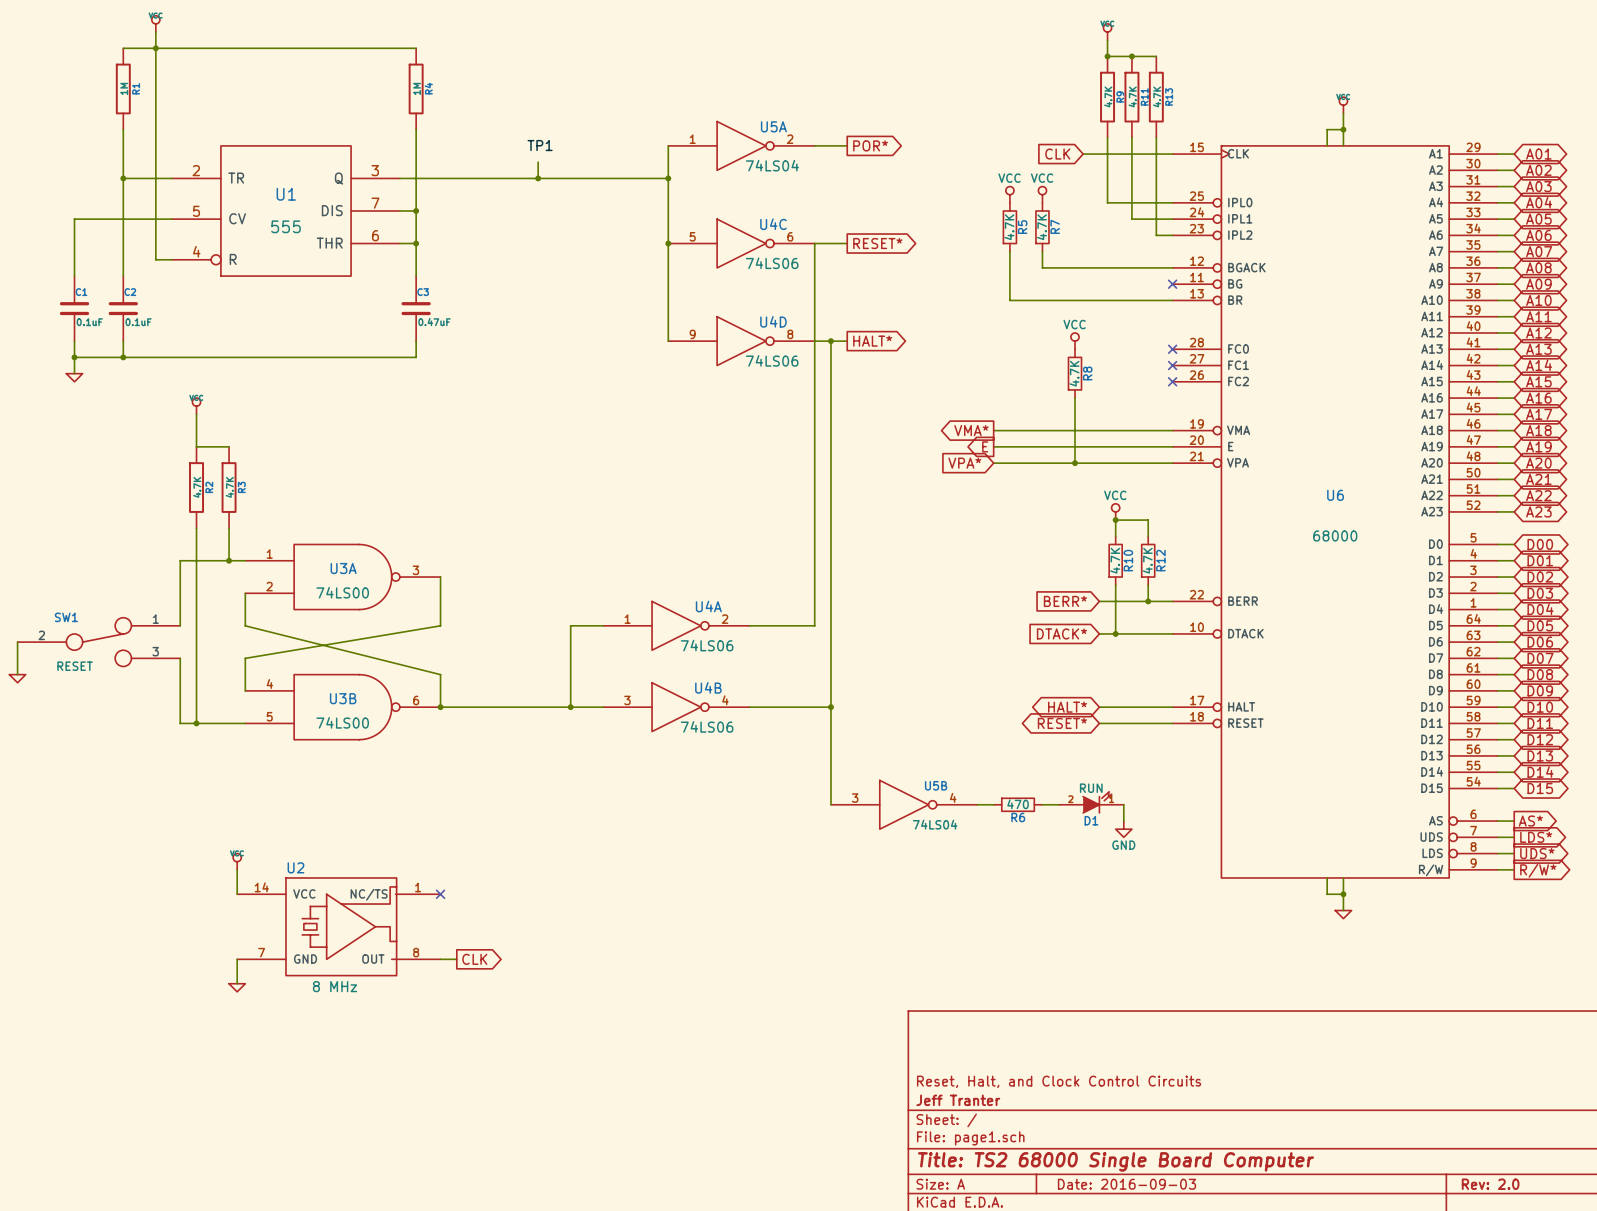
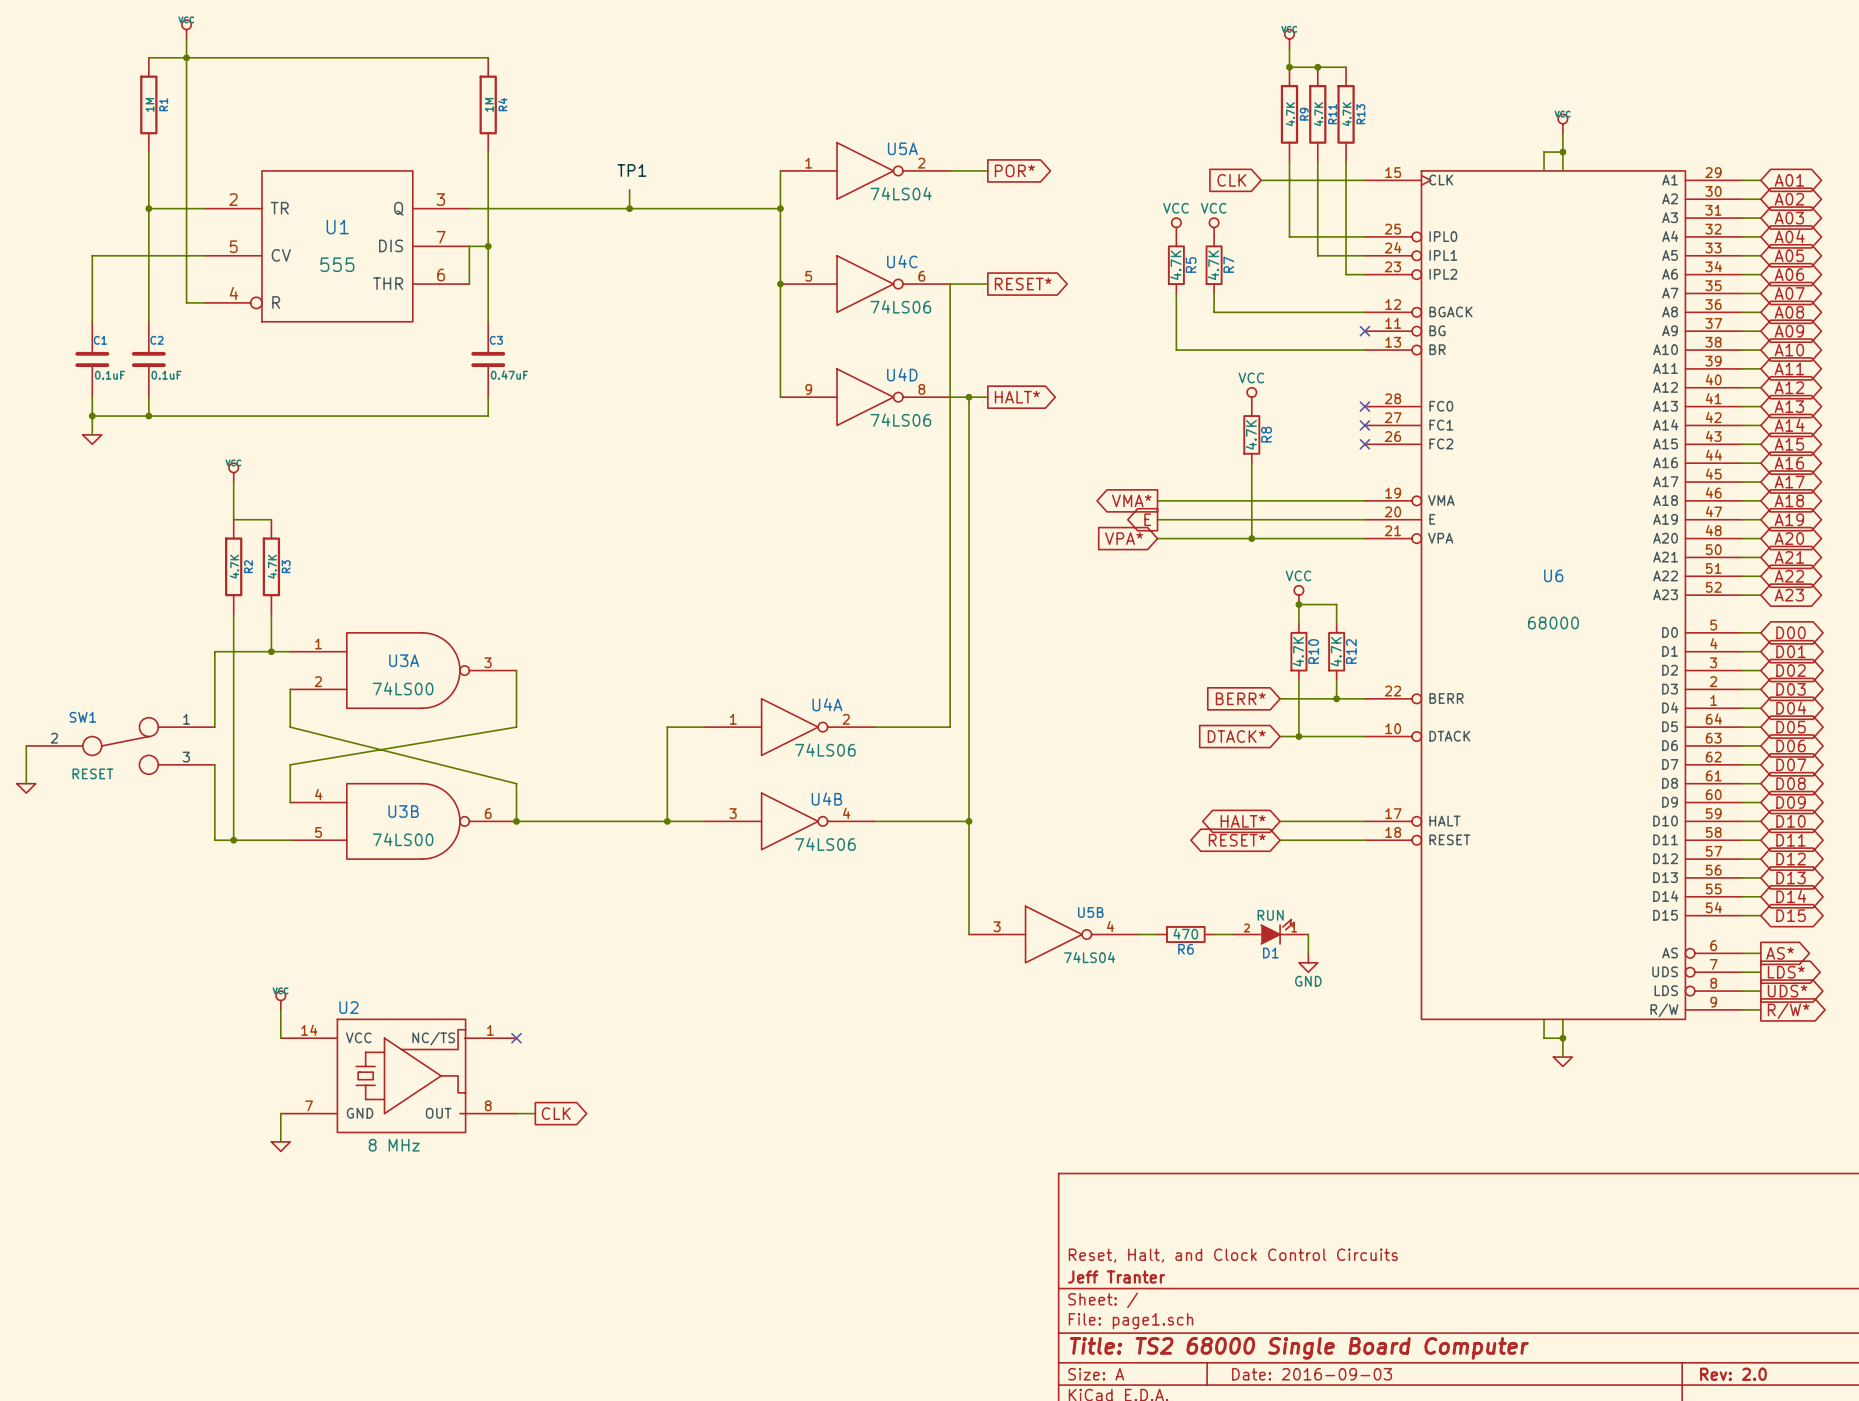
wire: (399, 243) (416, 243) -> (469, 284) (469, 246)
junction: (416, 243) -> none

